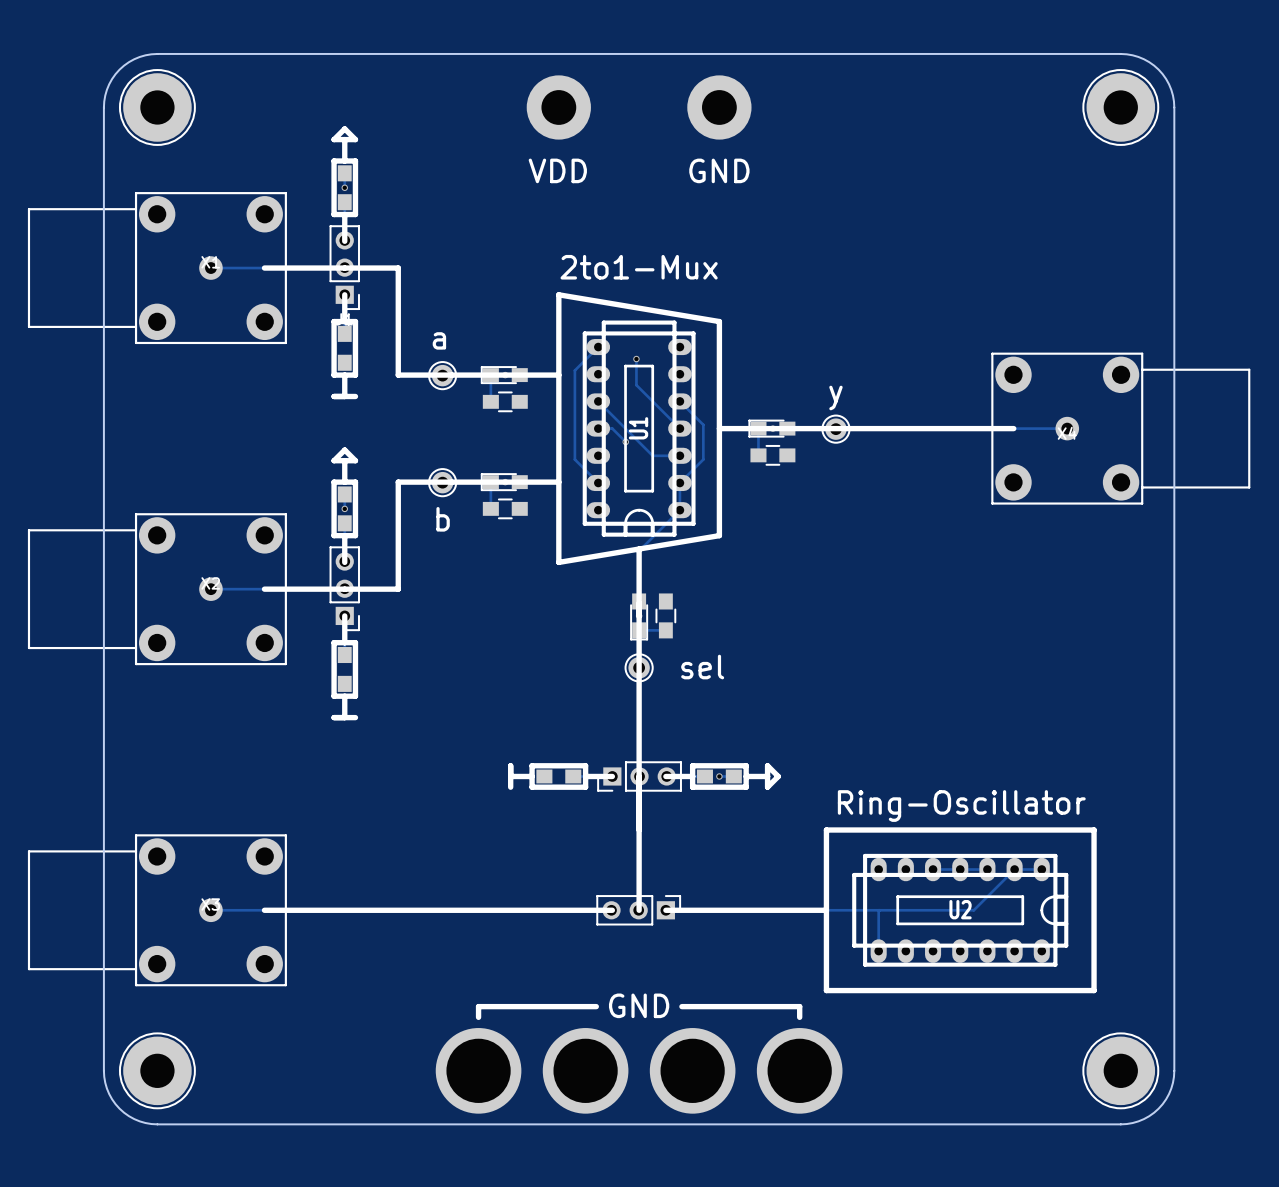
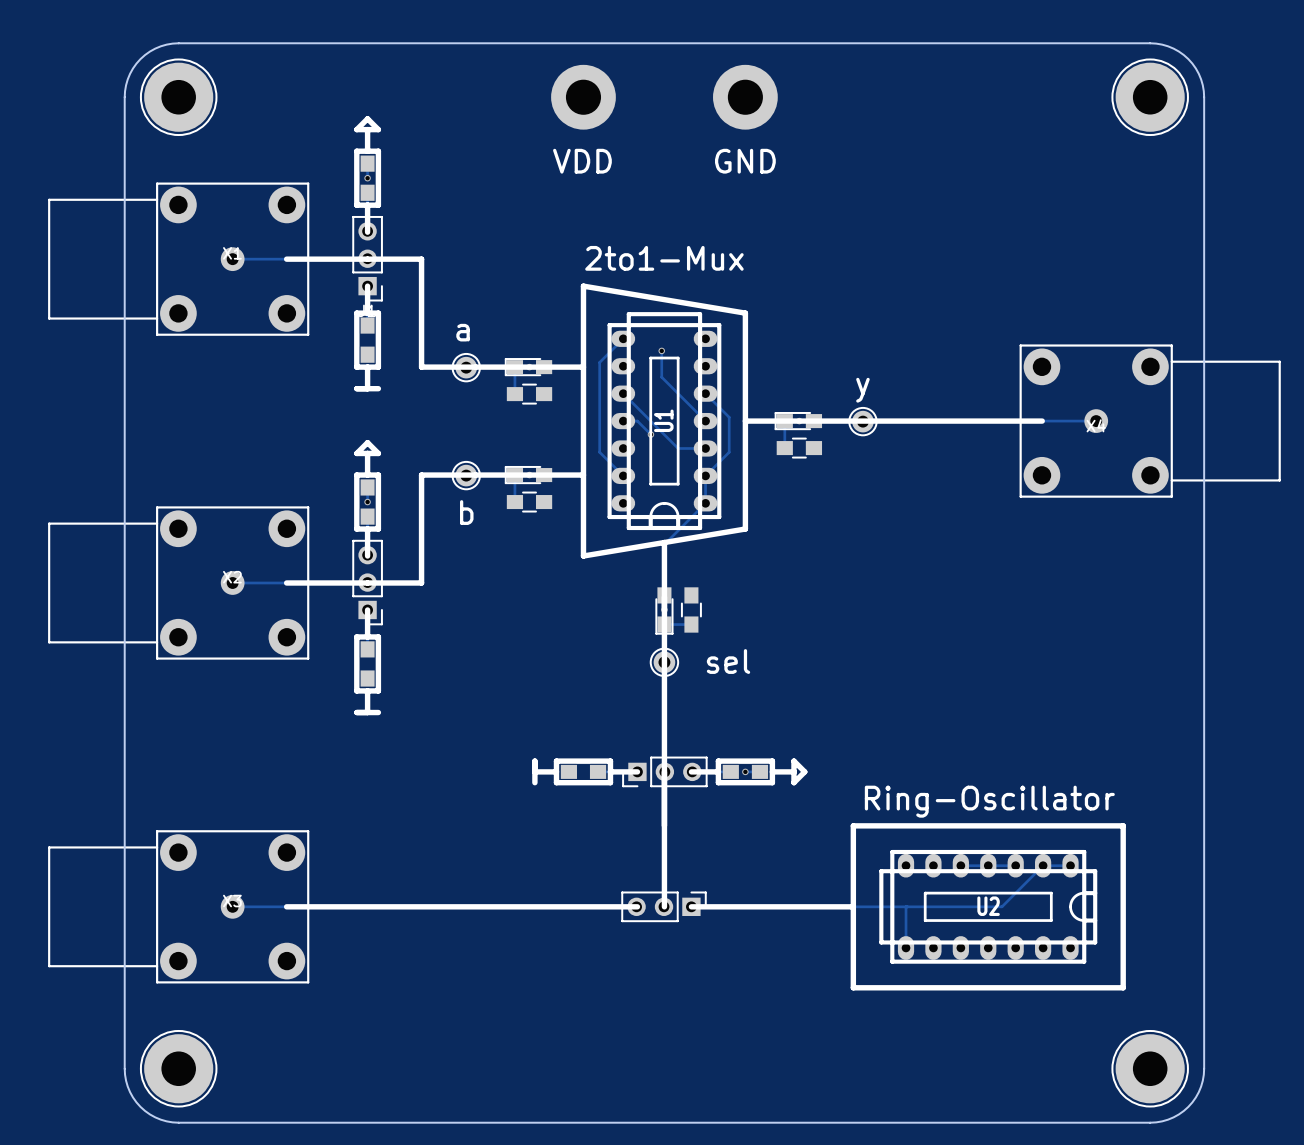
text: GND (639, 1005) -> none
line: (596, 1006) (478, 1006) (478, 1017) -> none
line: (681, 1006) (799, 1006) (799, 1017) -> none
part: (478, 1070) -> none
part: (585, 1070) -> none
part: (692, 1070) -> none
part: (799, 1070) -> none

